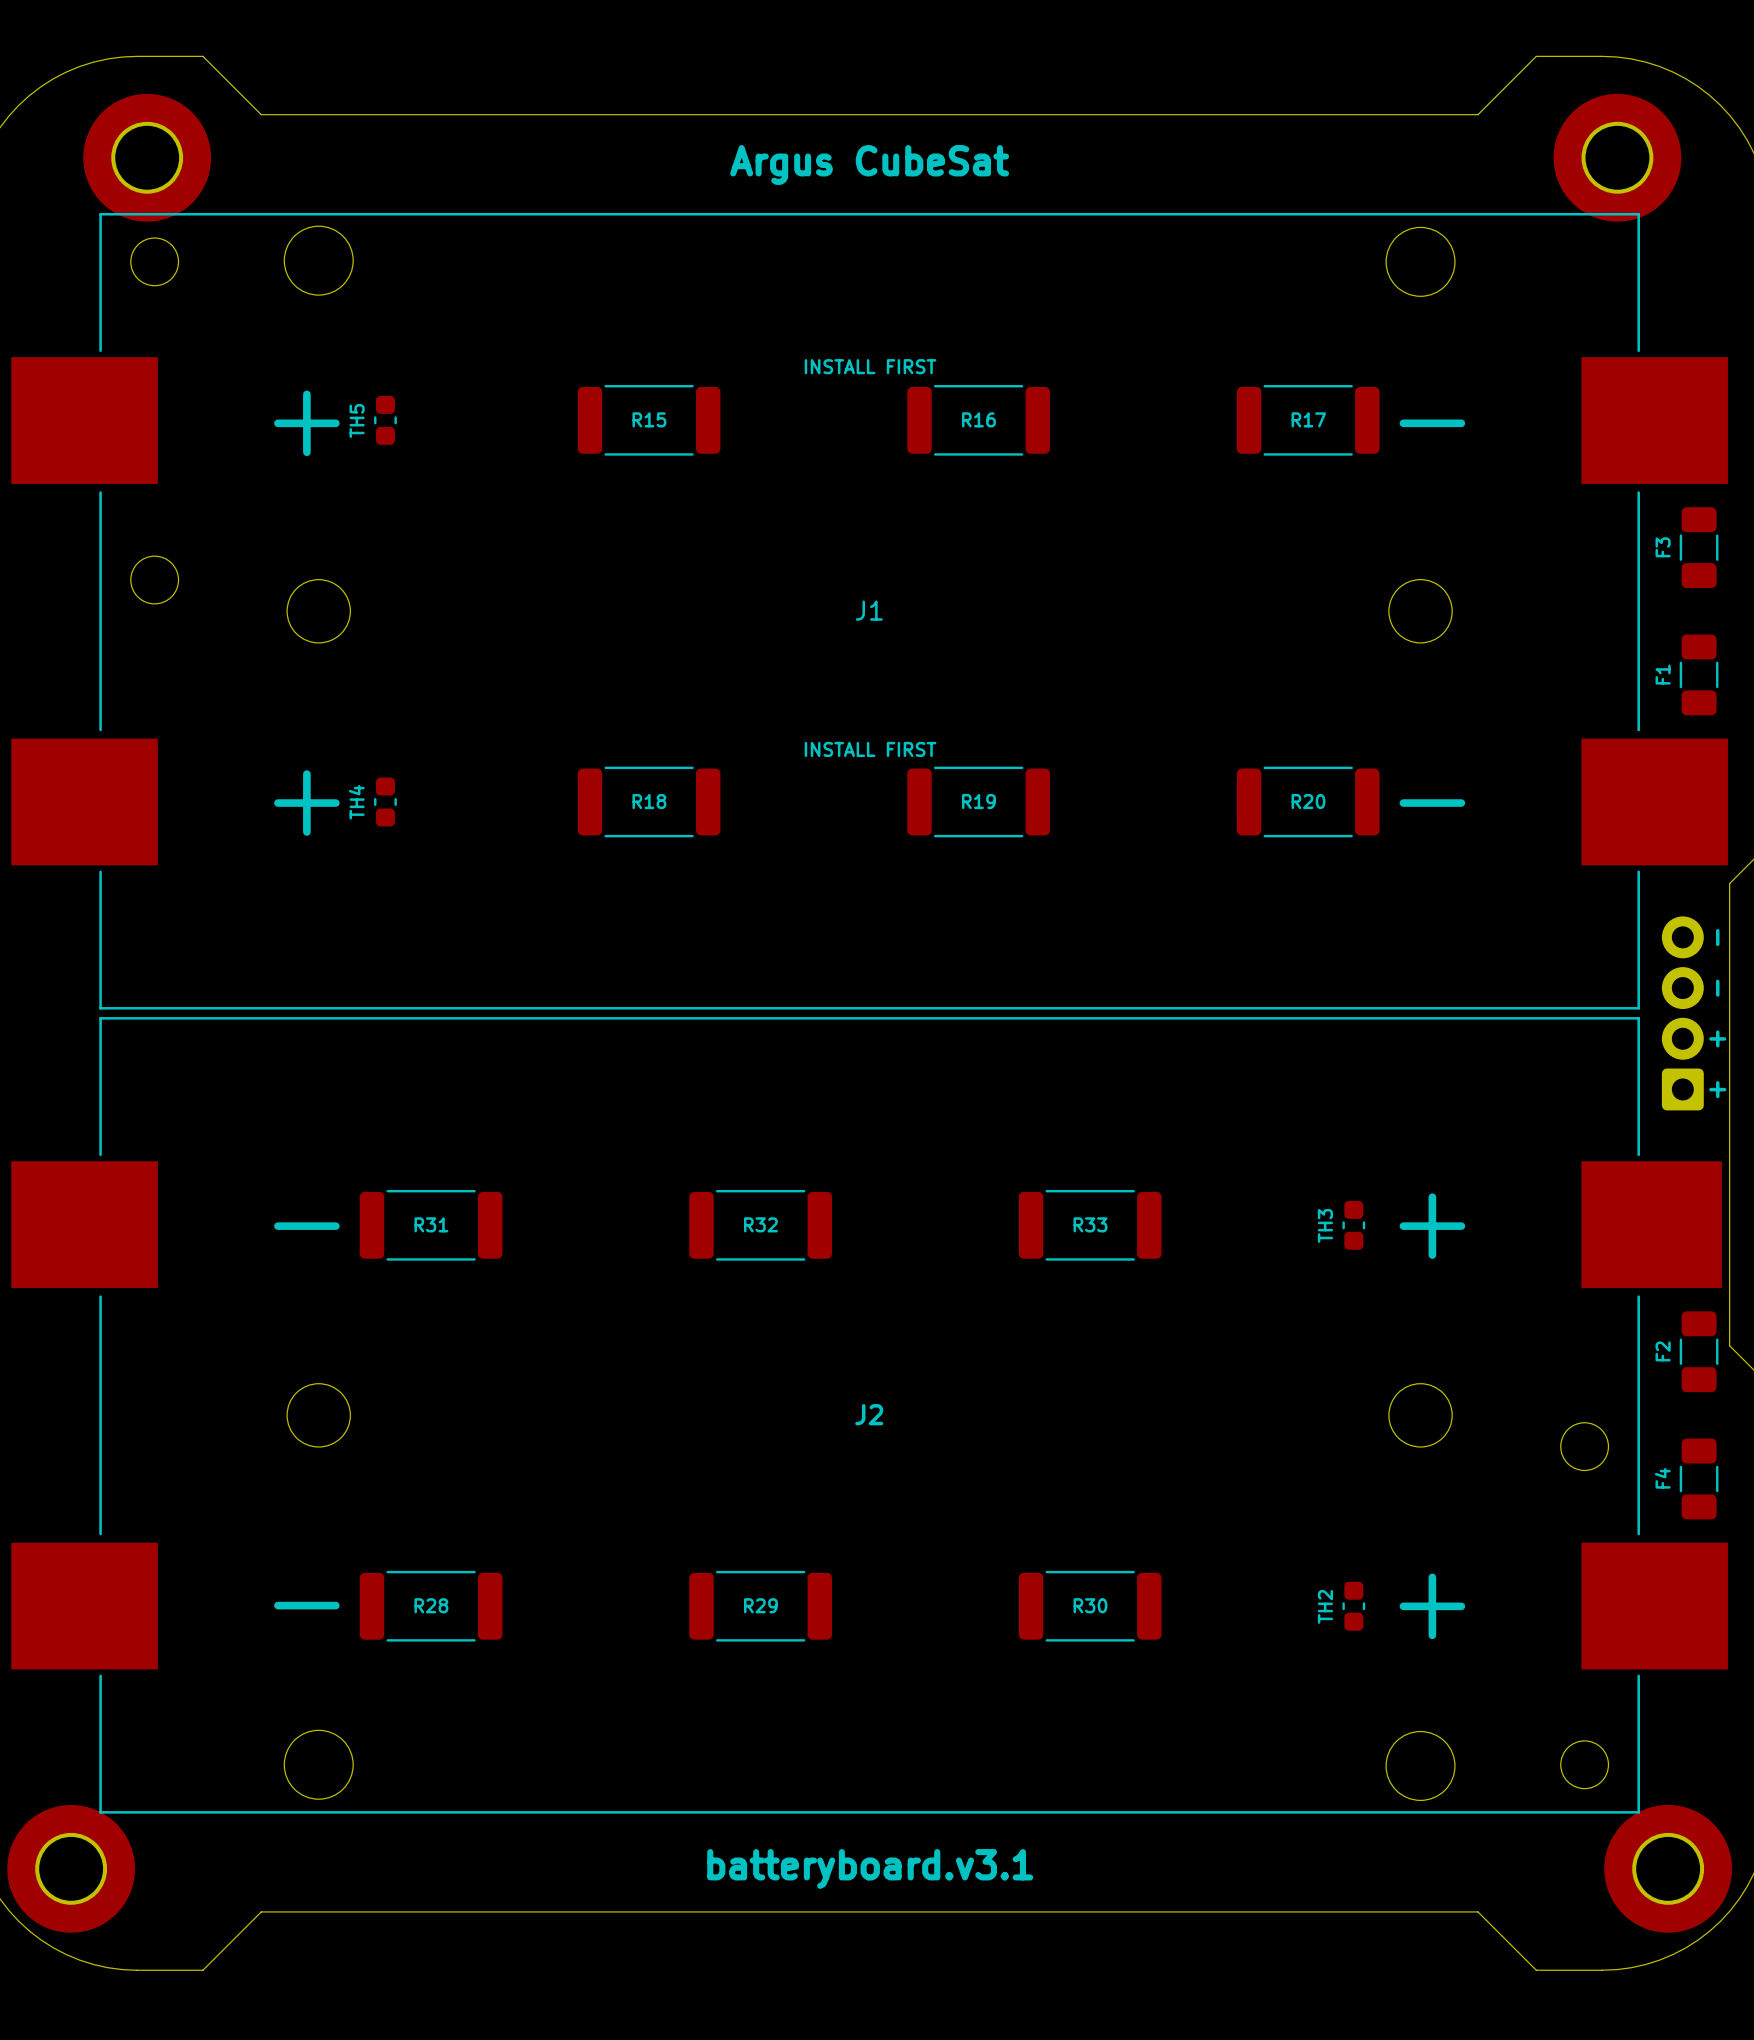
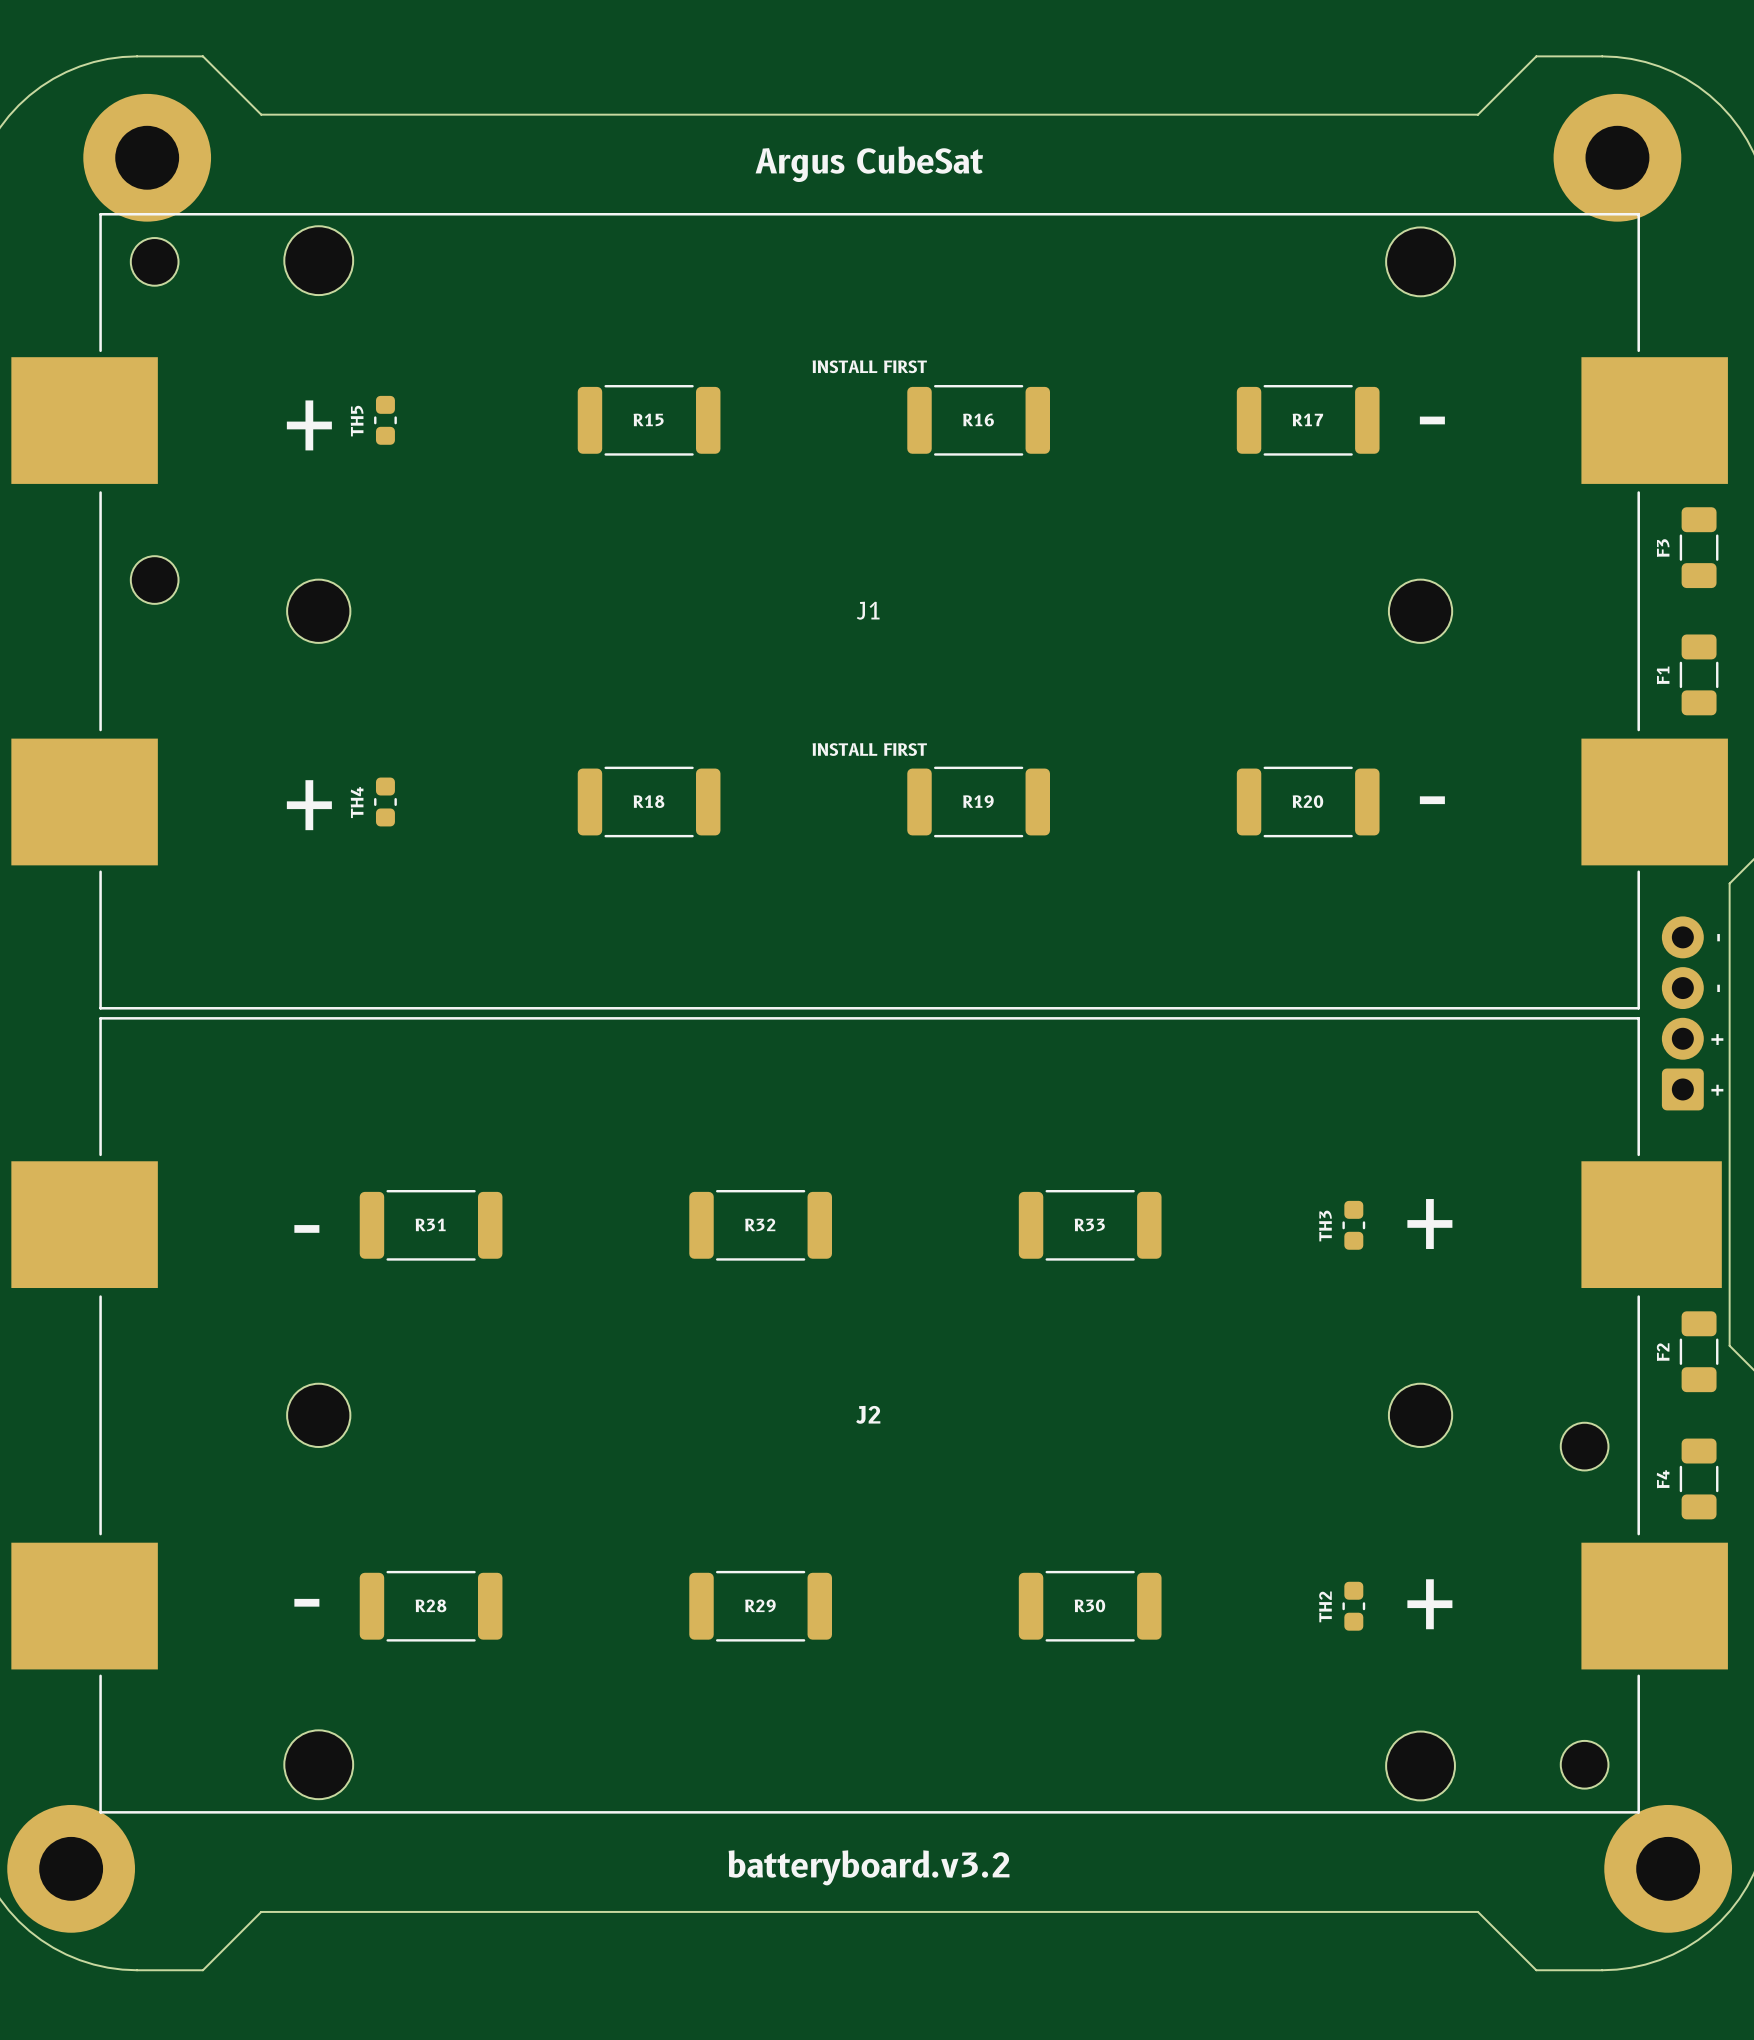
text: batteryboard.v3.1 (870, 1868) -> batteryboard.v3.2 (869, 1867)

